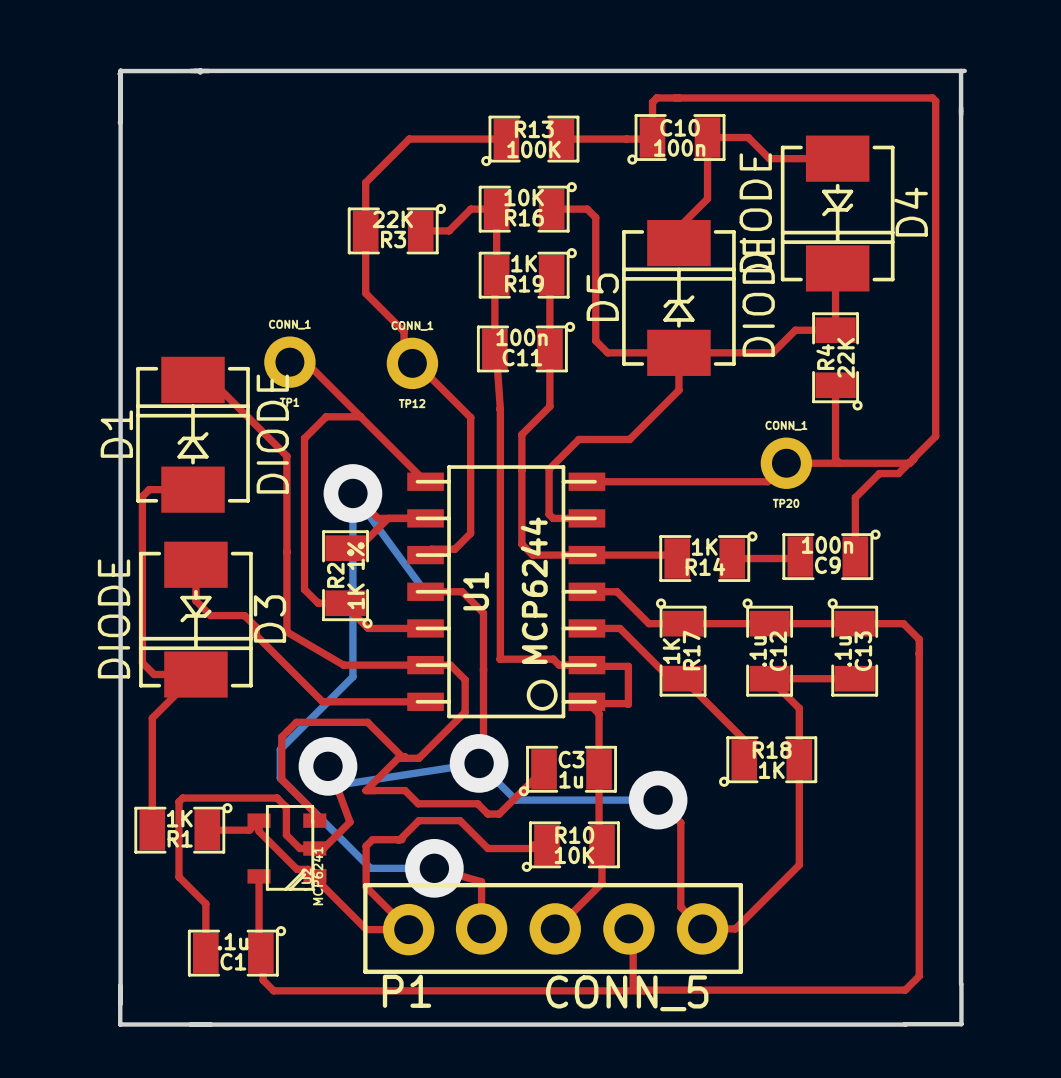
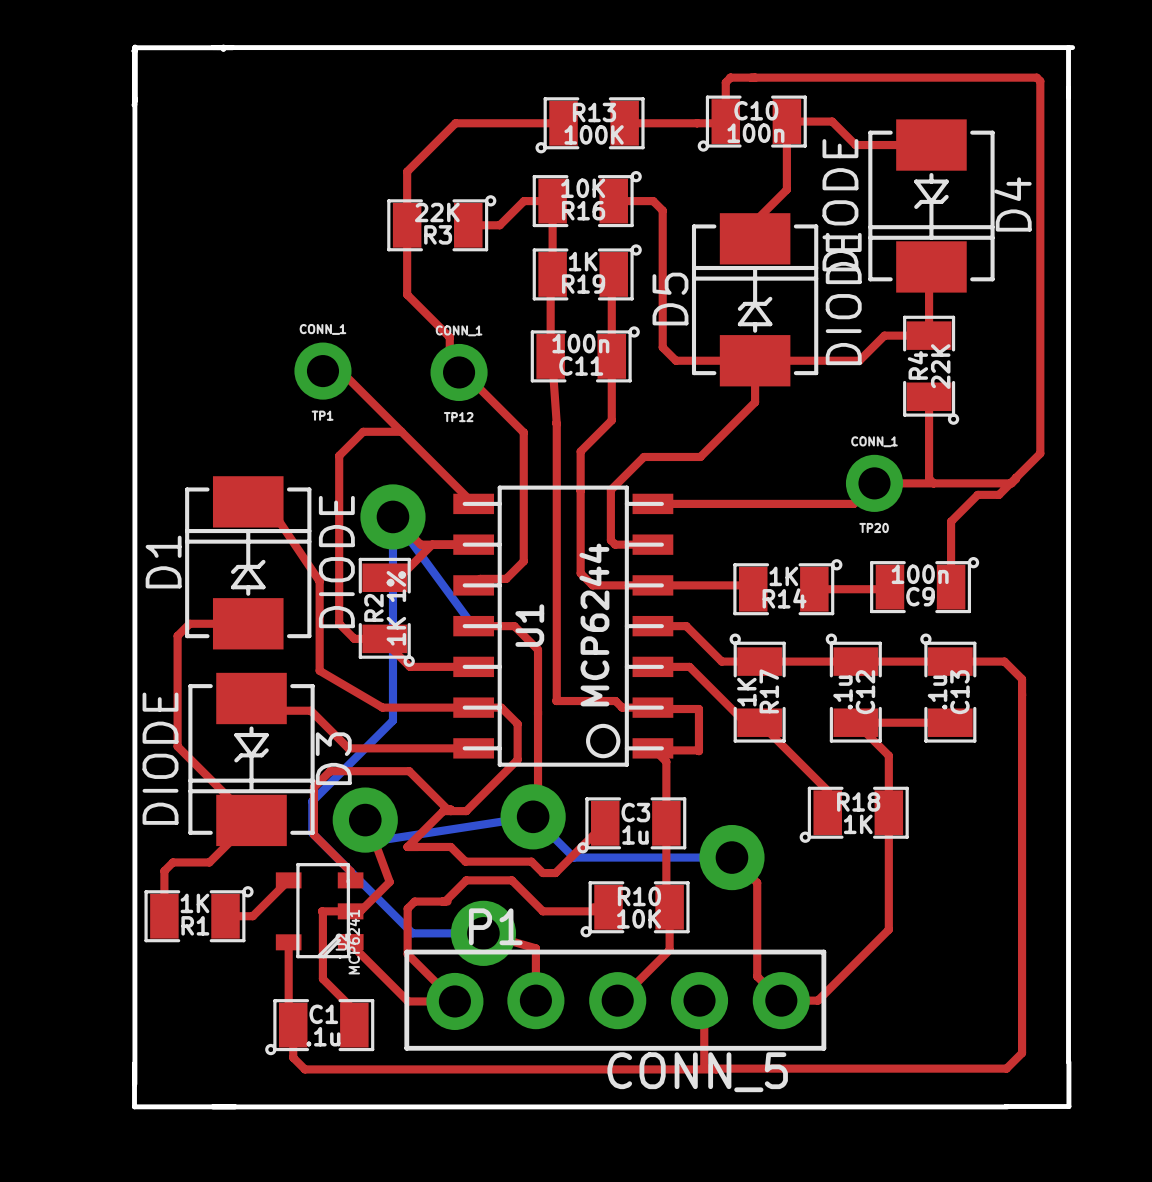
top track: (193, 379) (210, 379) (286, 456) (286, 551) -> (248, 501) (266, 501) (319, 581)
D1 position: (193, 434) -> (248, 562)
top track: (193, 489) (149, 489) (142, 496) (142, 662) (154, 674) (195, 674) (152, 718) (152, 830) -> none
top track: (195, 564) (195, 600) (210, 615) (244, 615) (256, 627) (256, 635) (322, 701) -> (251, 698) (263, 710) (310, 710) (348, 748) (359, 748)
top track: none -> (248, 623) (189, 623) (177, 635) (177, 746) (251, 820) (209, 862) (172, 862) (164, 871) (164, 916)
D3 position: (195, 619) -> (251, 759)
top track: (259, 820) (259, 831) (296, 869) (308, 869) (314, 876) -> none
R1 position: (183, 828) -> (199, 914)
top track: (207, 830) (249, 830) -> (225, 916) (252, 916) (278, 890)
top track: (299, 848) (286, 835) (286, 807) (277, 798) (182, 798) (178, 801) (178, 877) (205, 903) (205, 953) -> (334, 911) (322, 911) (322, 978) (354, 1010) (354, 1025)
C1 rotation: 0° (237, 951) -> 180° (319, 1027)
P1 name position: P1 (407, 991) -> P1 (495, 926)

